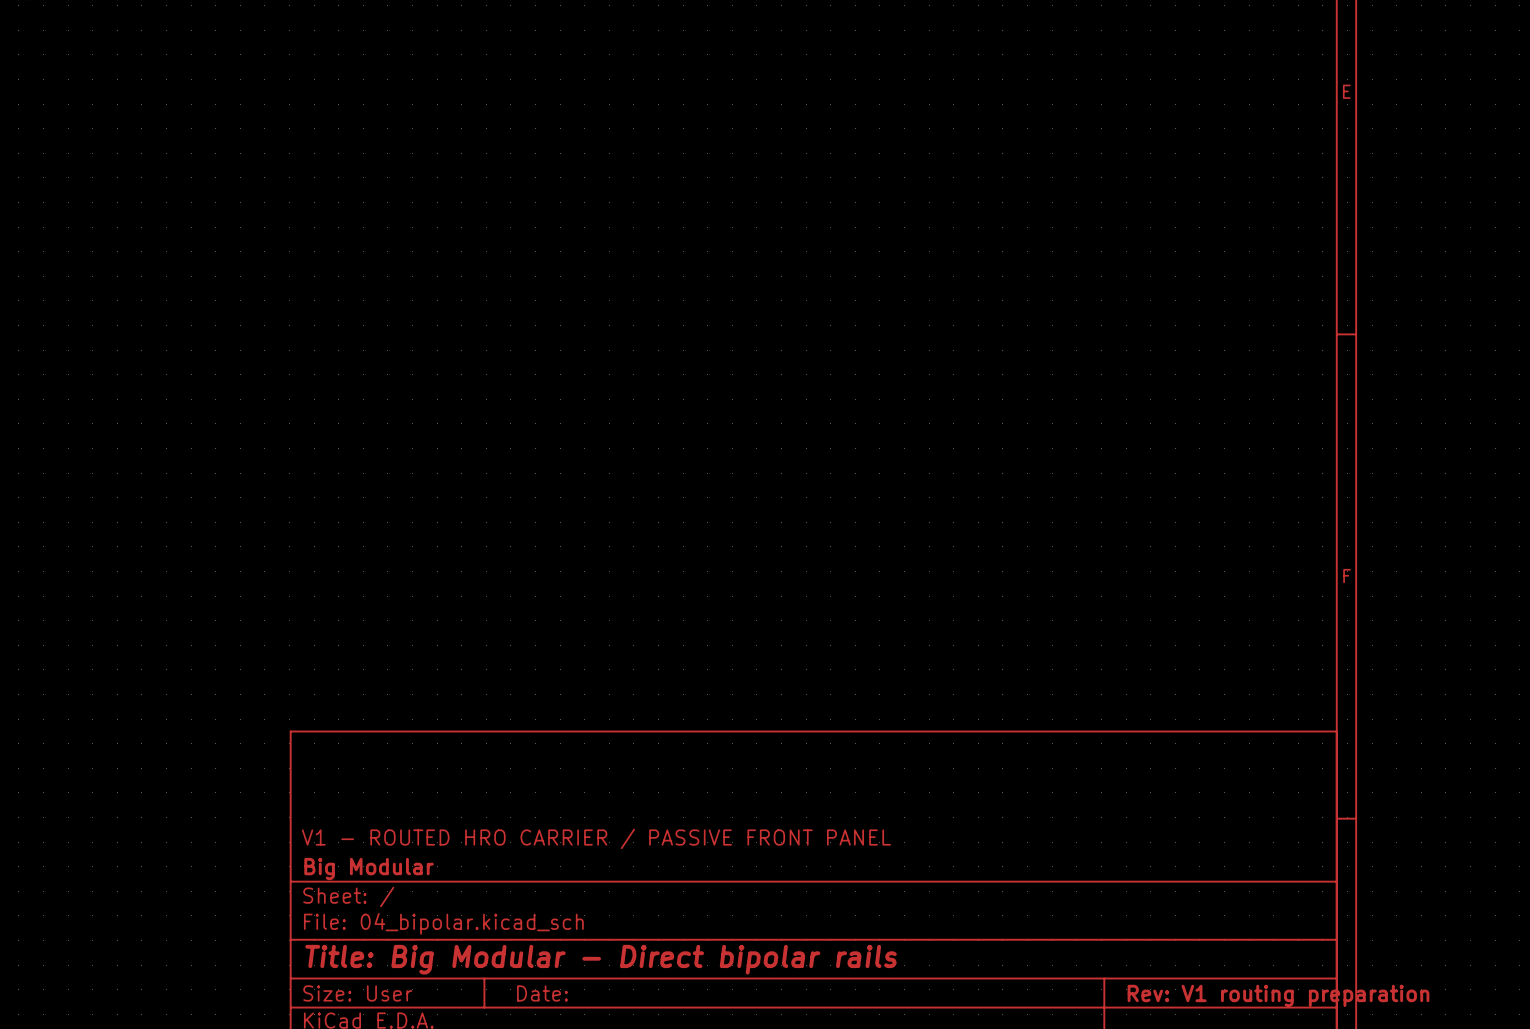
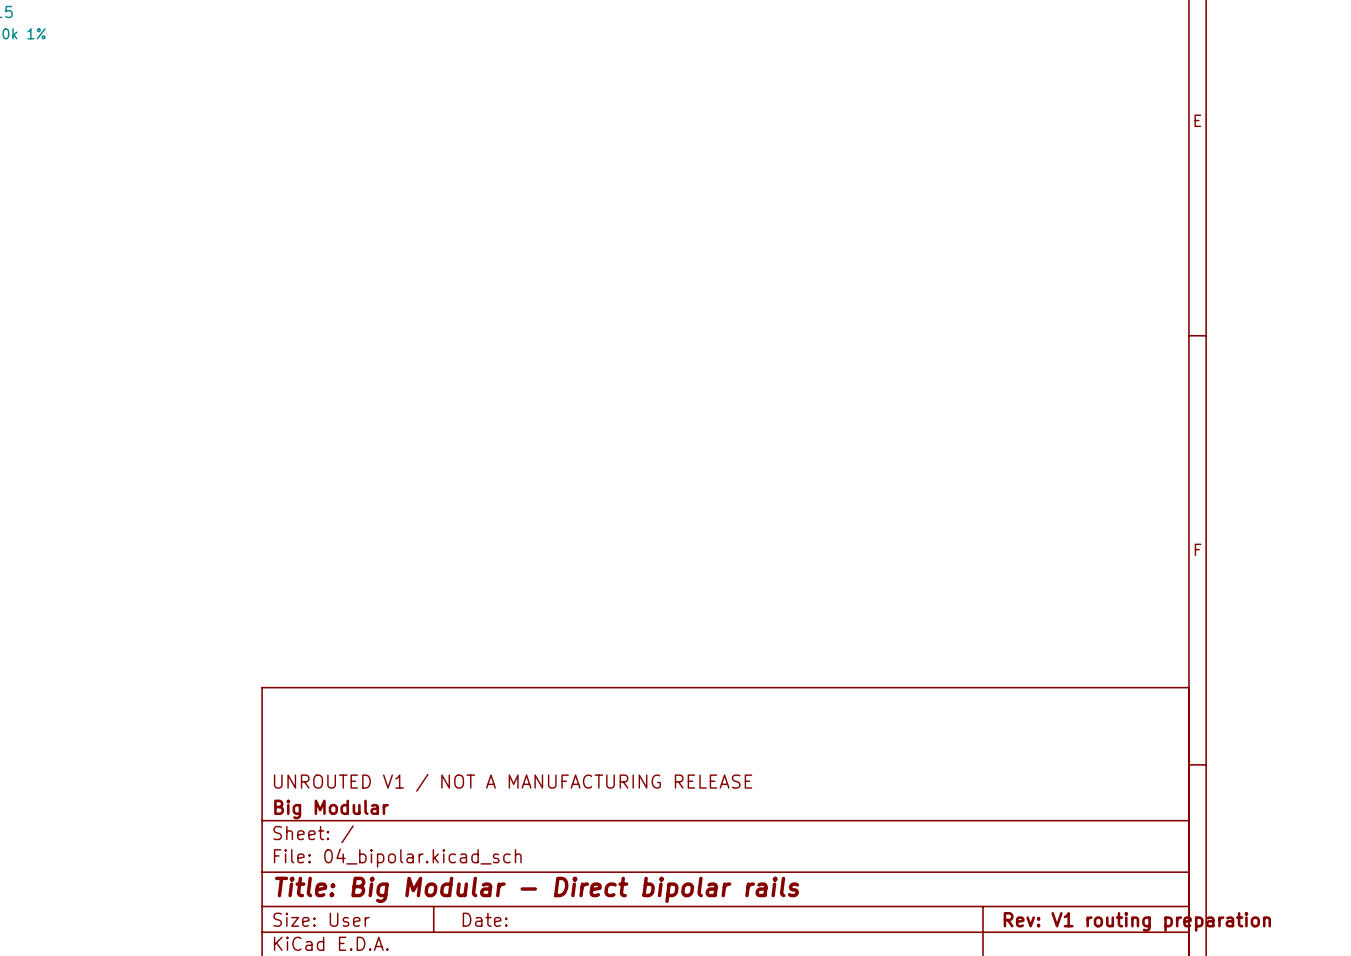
title block: V1 - ROUTED HRO CARRIER / PASSIVE FRONT PANEL (596, 838) -> UNROUTED V1 / NOT A MANUFACTURING RELEASE (513, 782)

